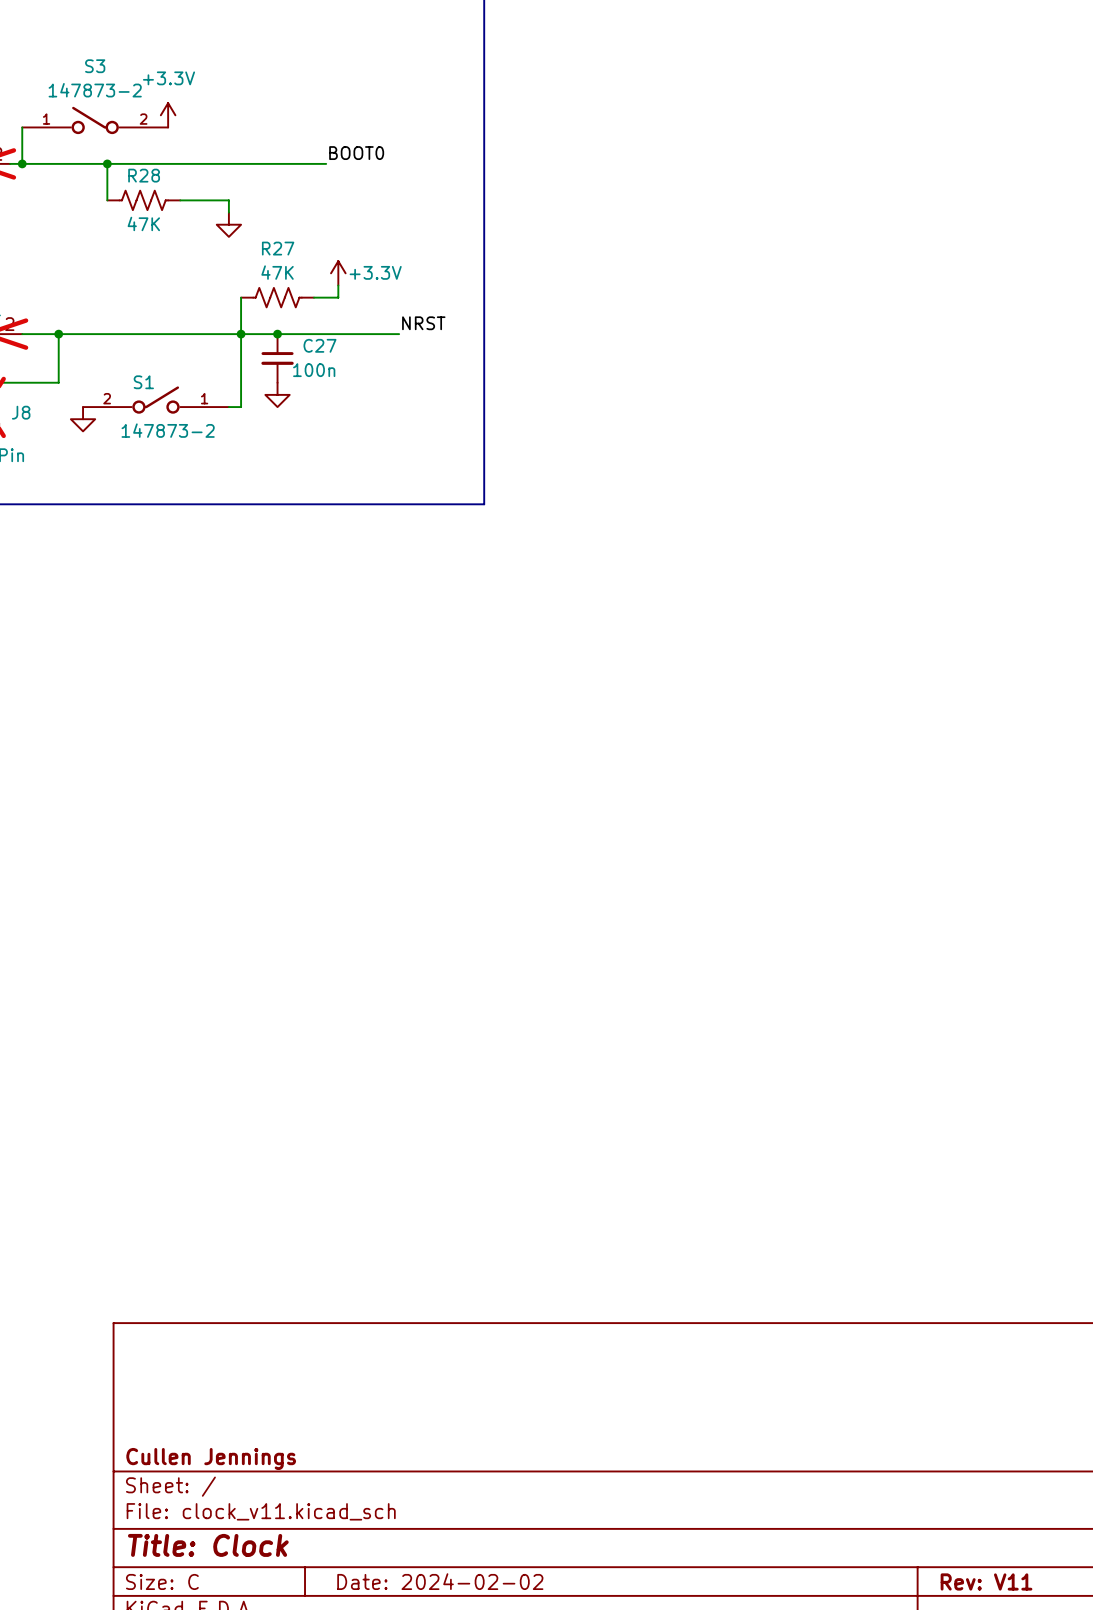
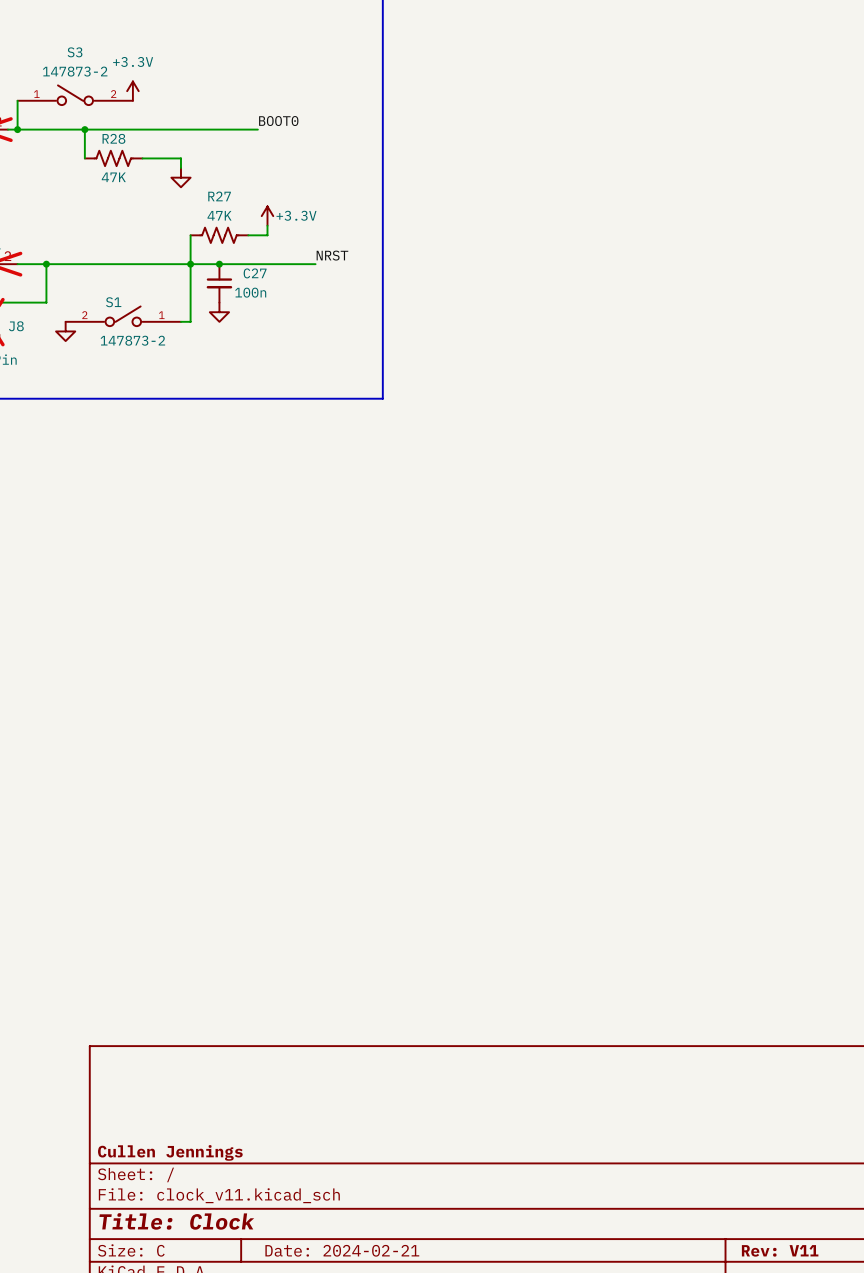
title block: Date: 2024-02-02 (440, 1581) -> Date: 2024-02-21 (342, 1250)

